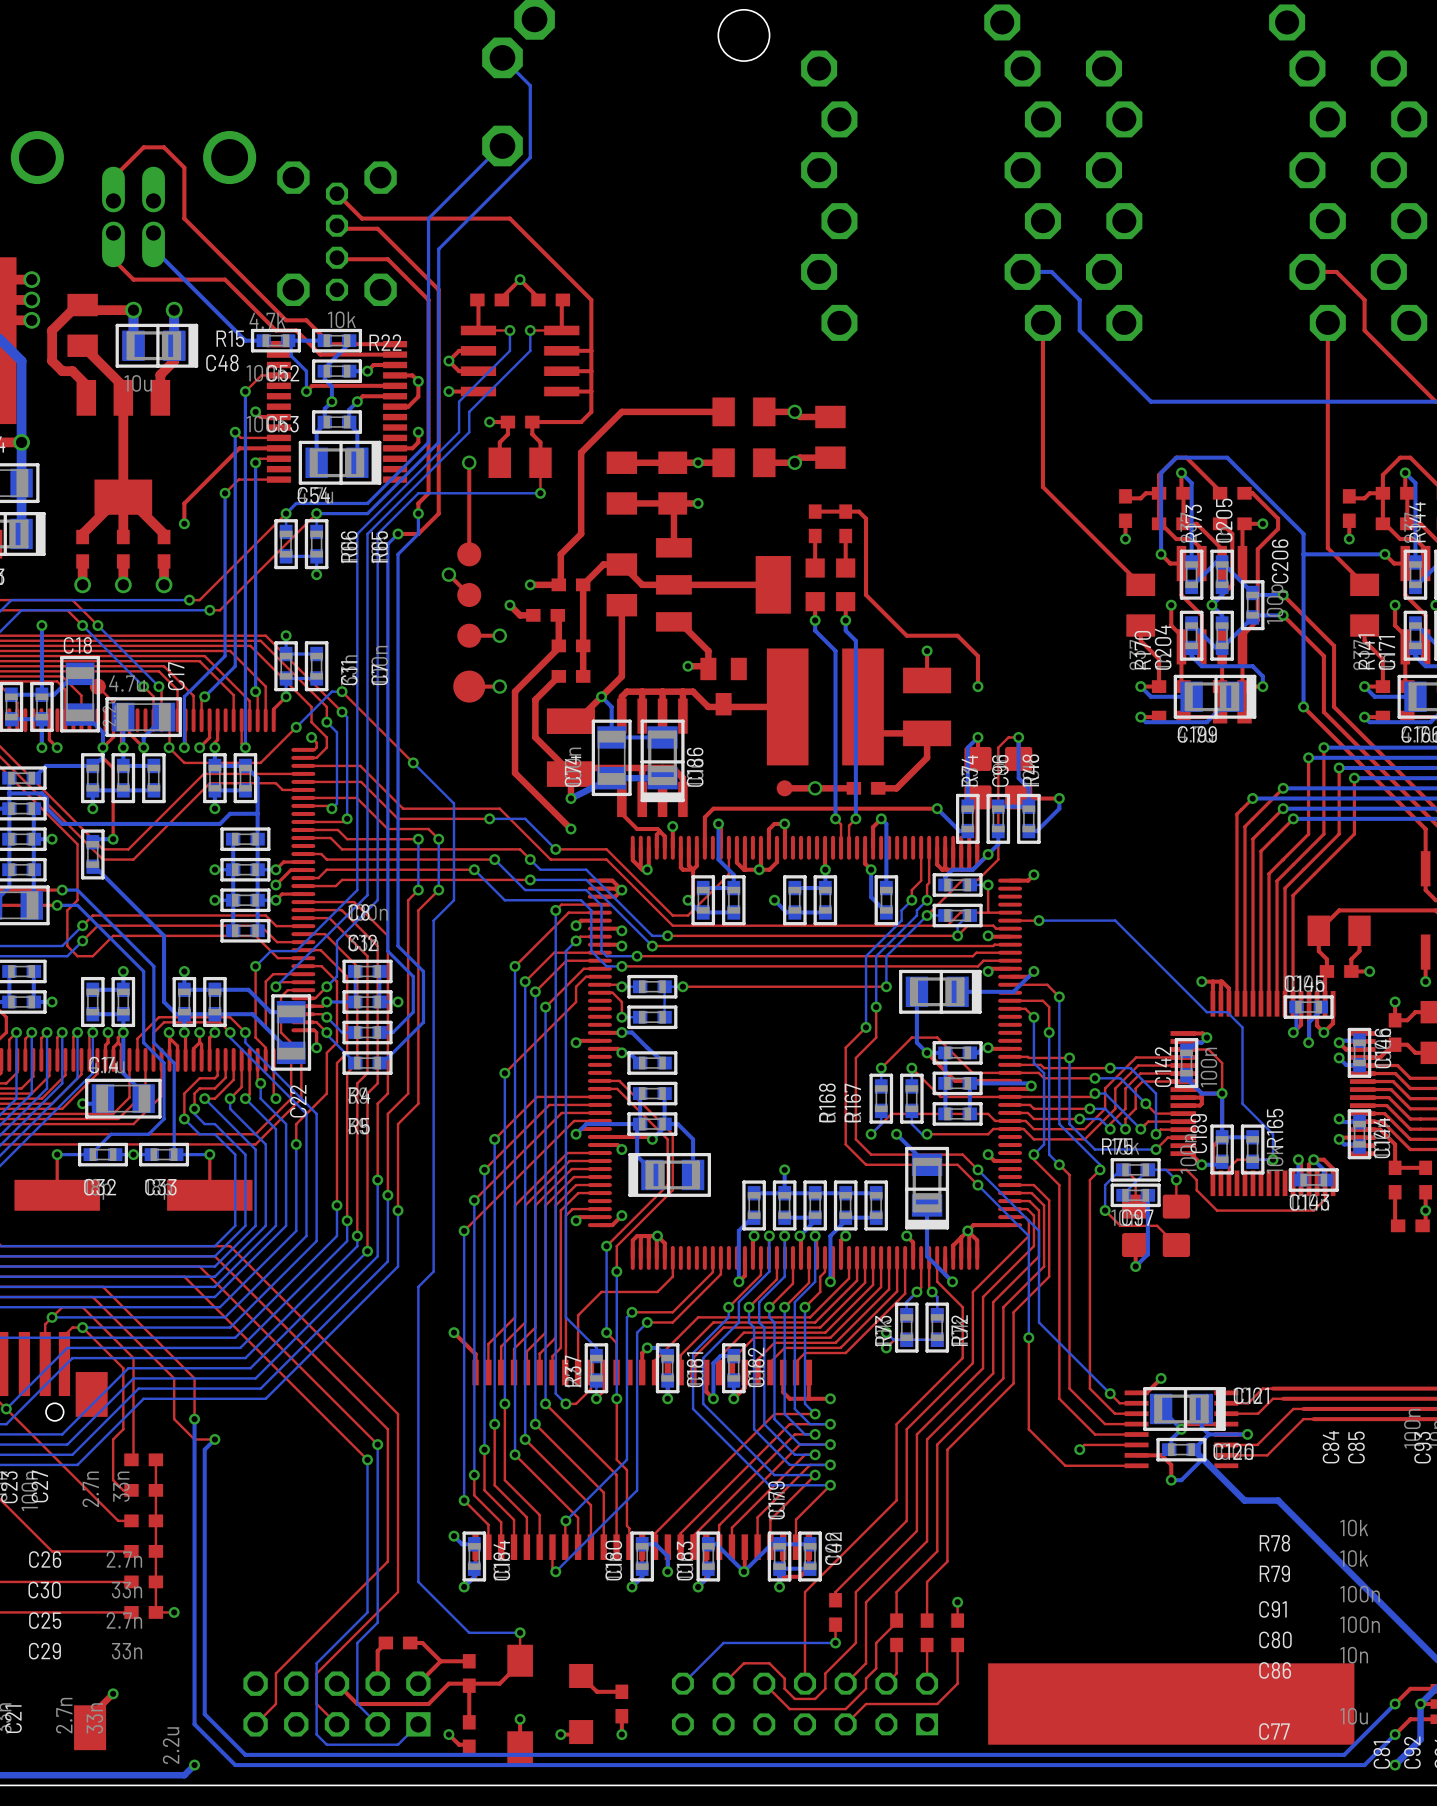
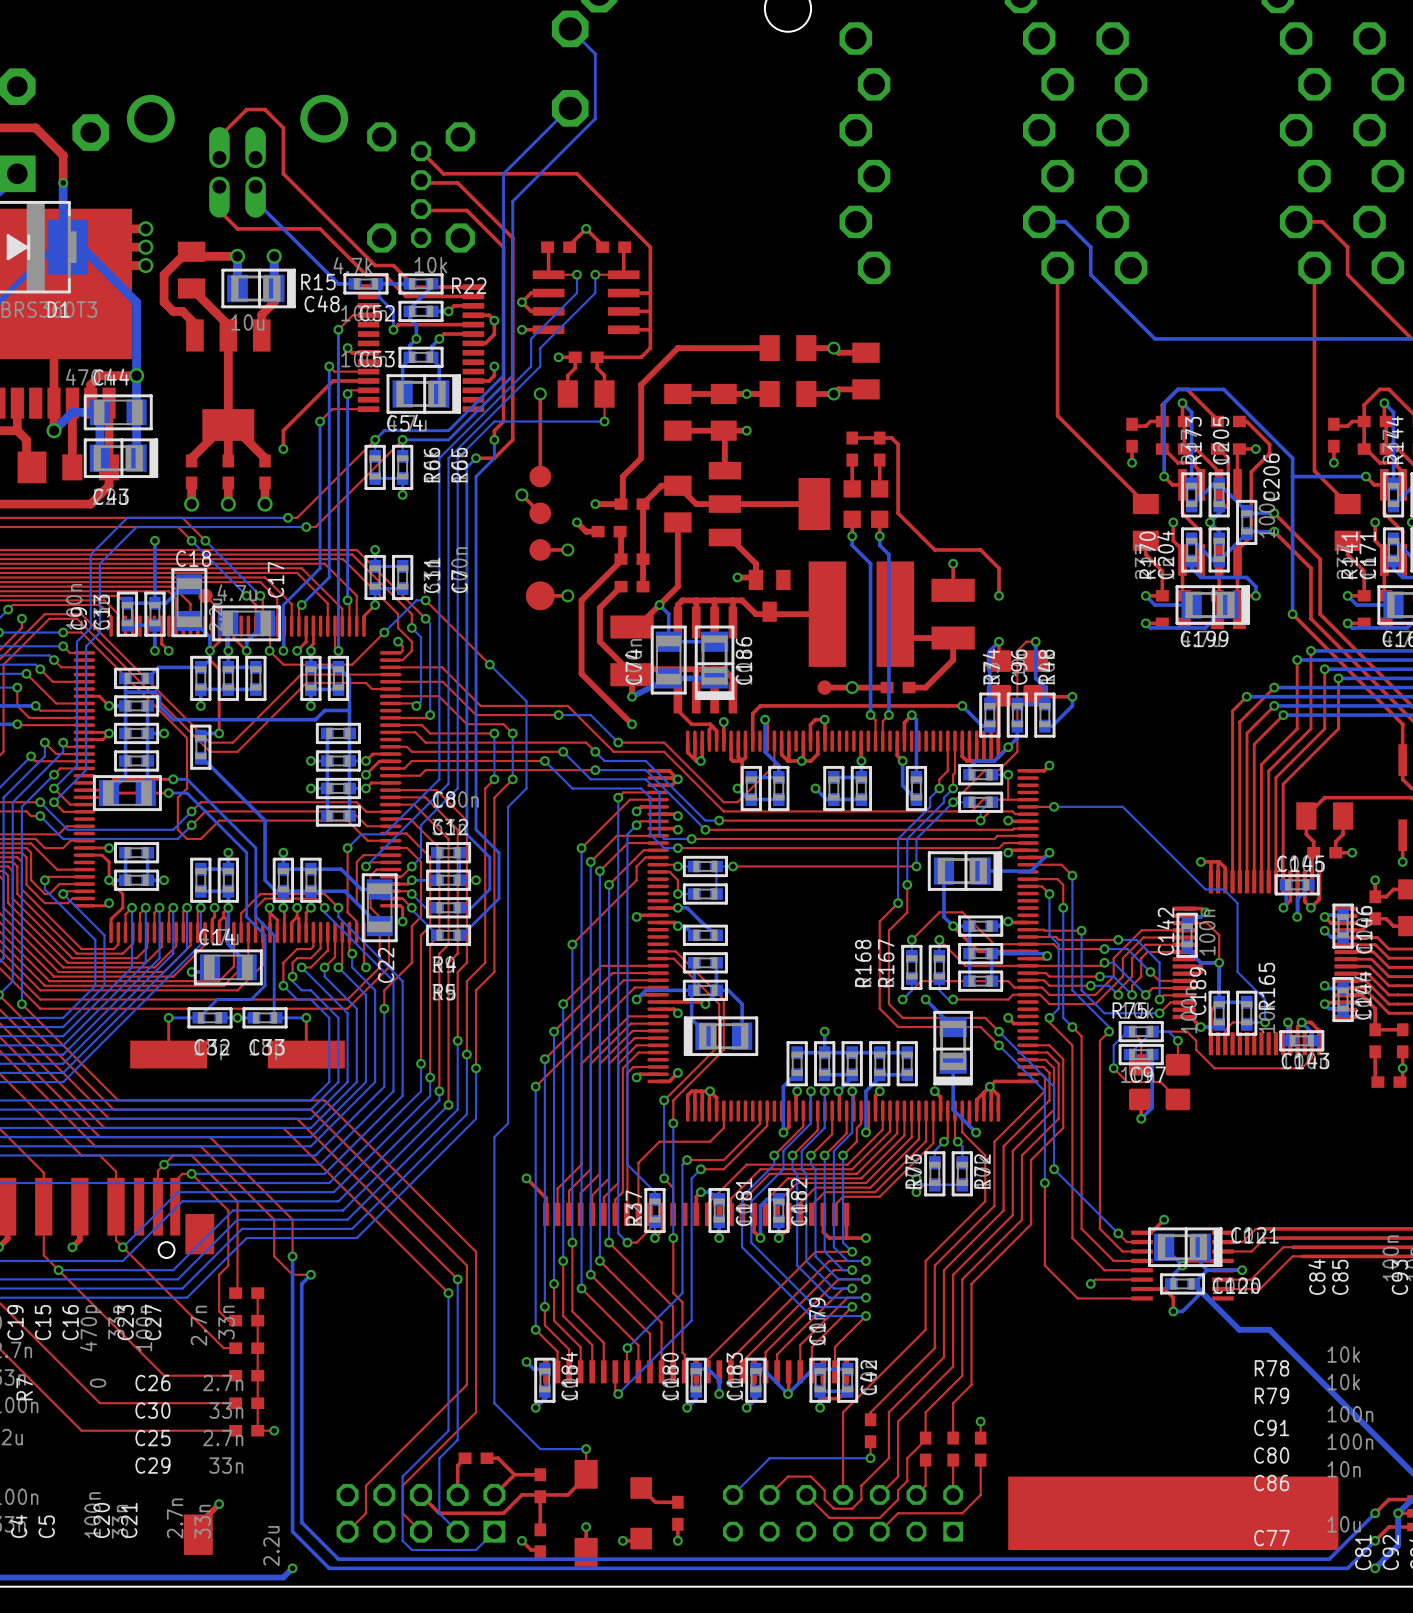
via: none -> (1054, 1169)

